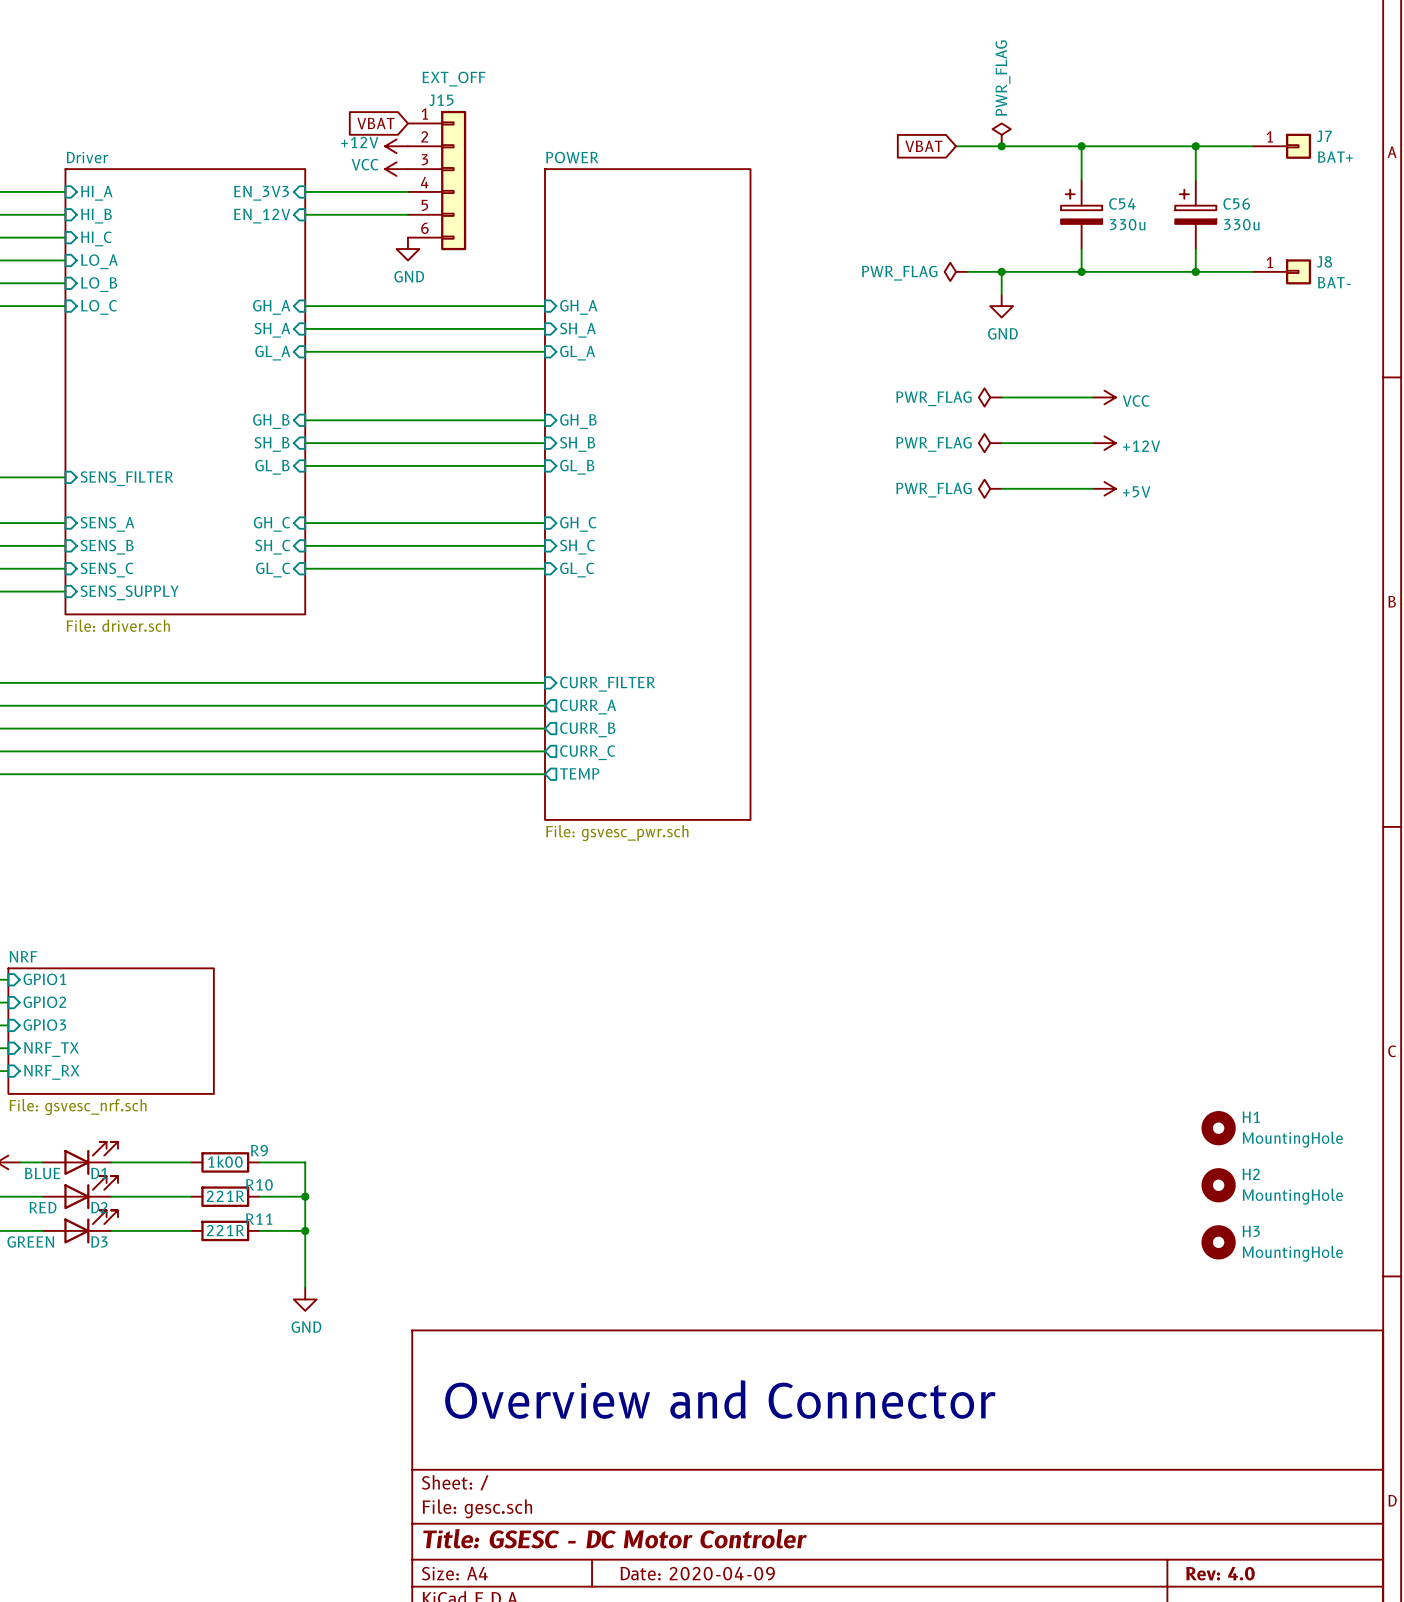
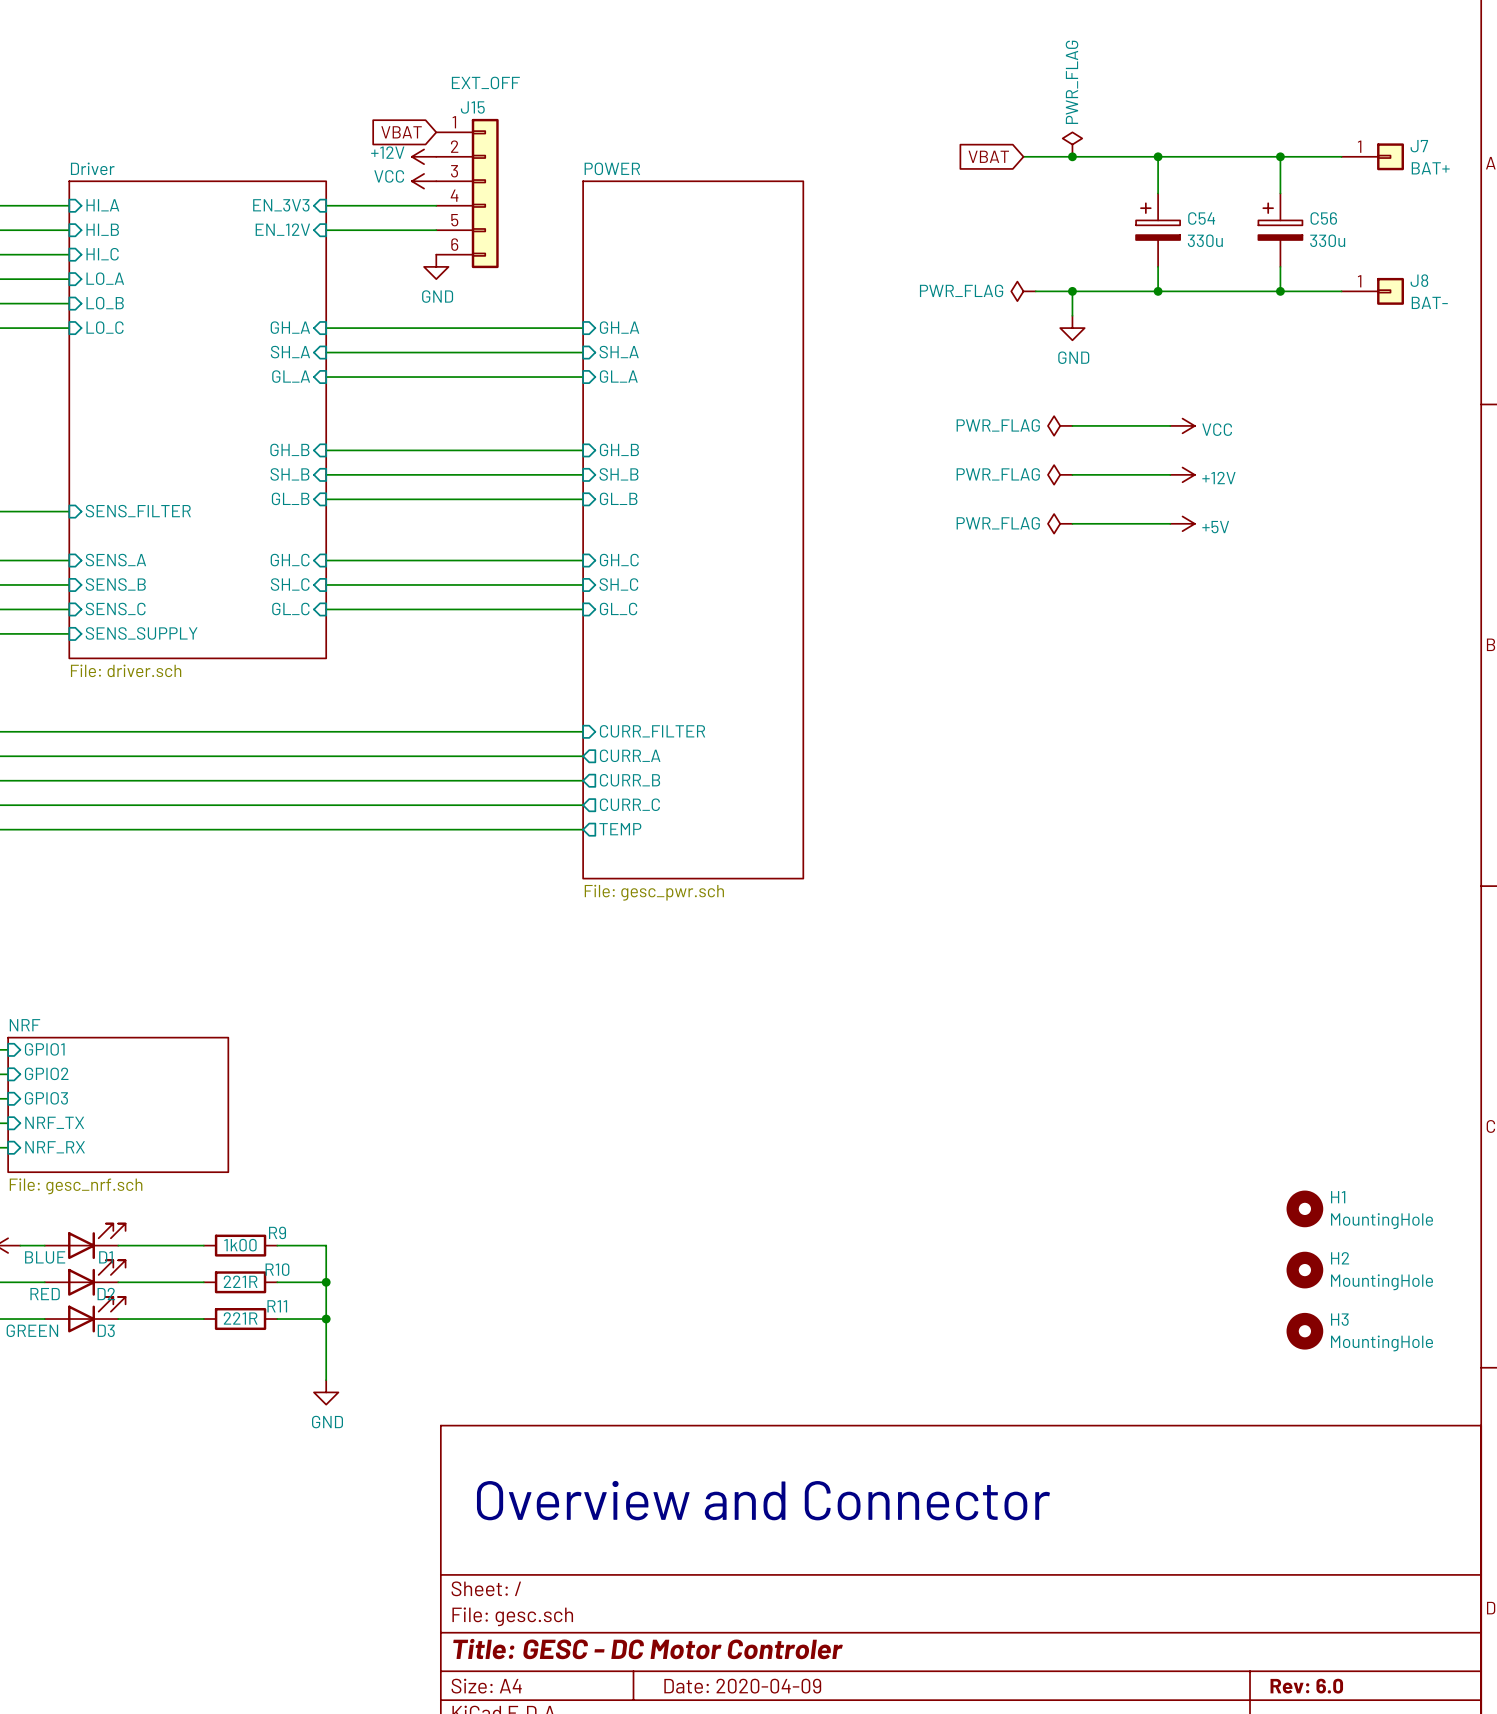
sheet POWER value: File: gsvesc_pwr.sch (617, 833) -> File: gesc_pwr.sch (654, 892)
sheet NRF value: File: gsvesc_nrf.sch (78, 1107) -> File: gesc_nrf.sch (76, 1186)
title block: Title: GSESC - DC Motor Controler (615, 1538) -> Title: GESC - DC Motor Controler (648, 1649)
title block: Rev: 4.0 (1220, 1573) -> Rev: 6.0 (1306, 1686)

